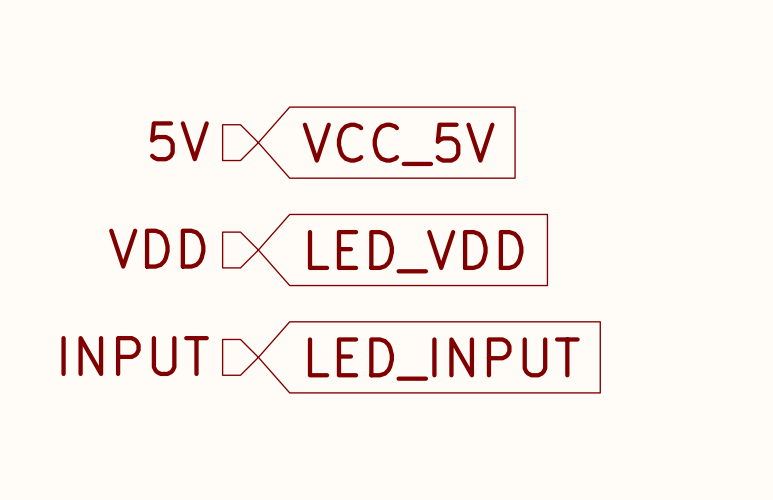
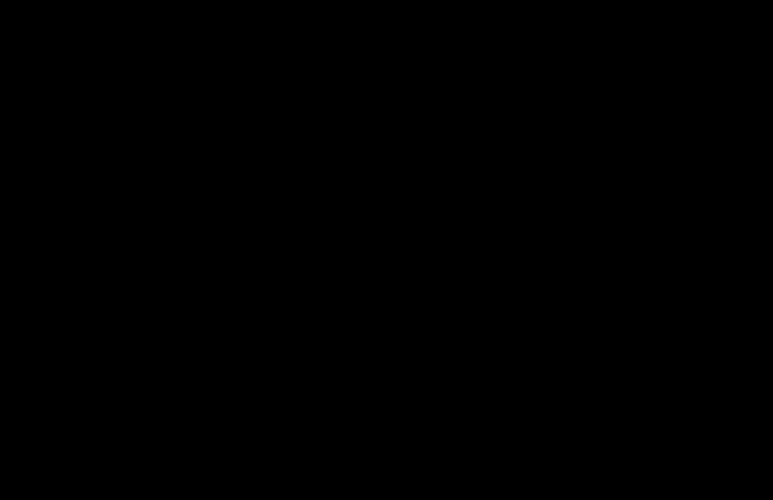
hierarchical label: 5V (179, 141) -> none
global label: VCC_5V (398, 144) -> none
hierarchical label: VDD (157, 248) -> none
global label: LED_VDD (415, 251) -> none
hierarchical label: INPUT (135, 356) -> none
global label: LED_INPUT (443, 359) -> none

